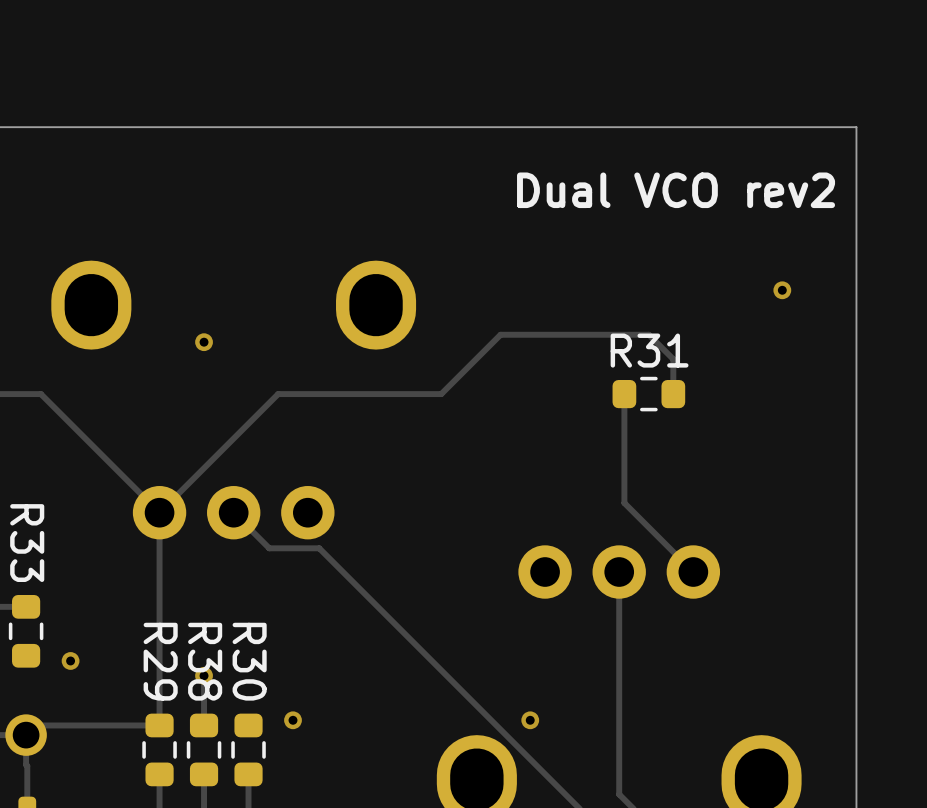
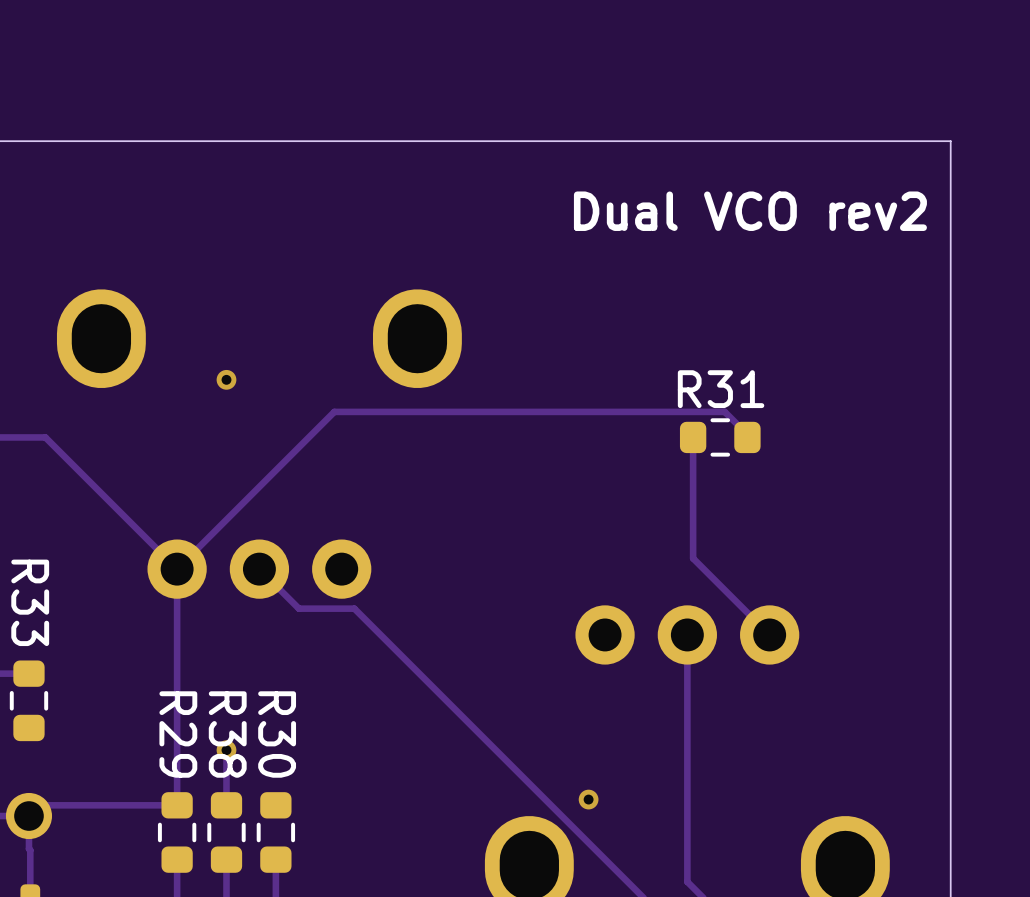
via: (782, 290) -> none
track: (673, 394) (673, 359) (648, 334) (500, 334) (441, 394) (278, 394) -> (750, 437) (724, 411) (334, 411) (308, 437)
via: (70, 660) -> none
via: (293, 720) -> none

